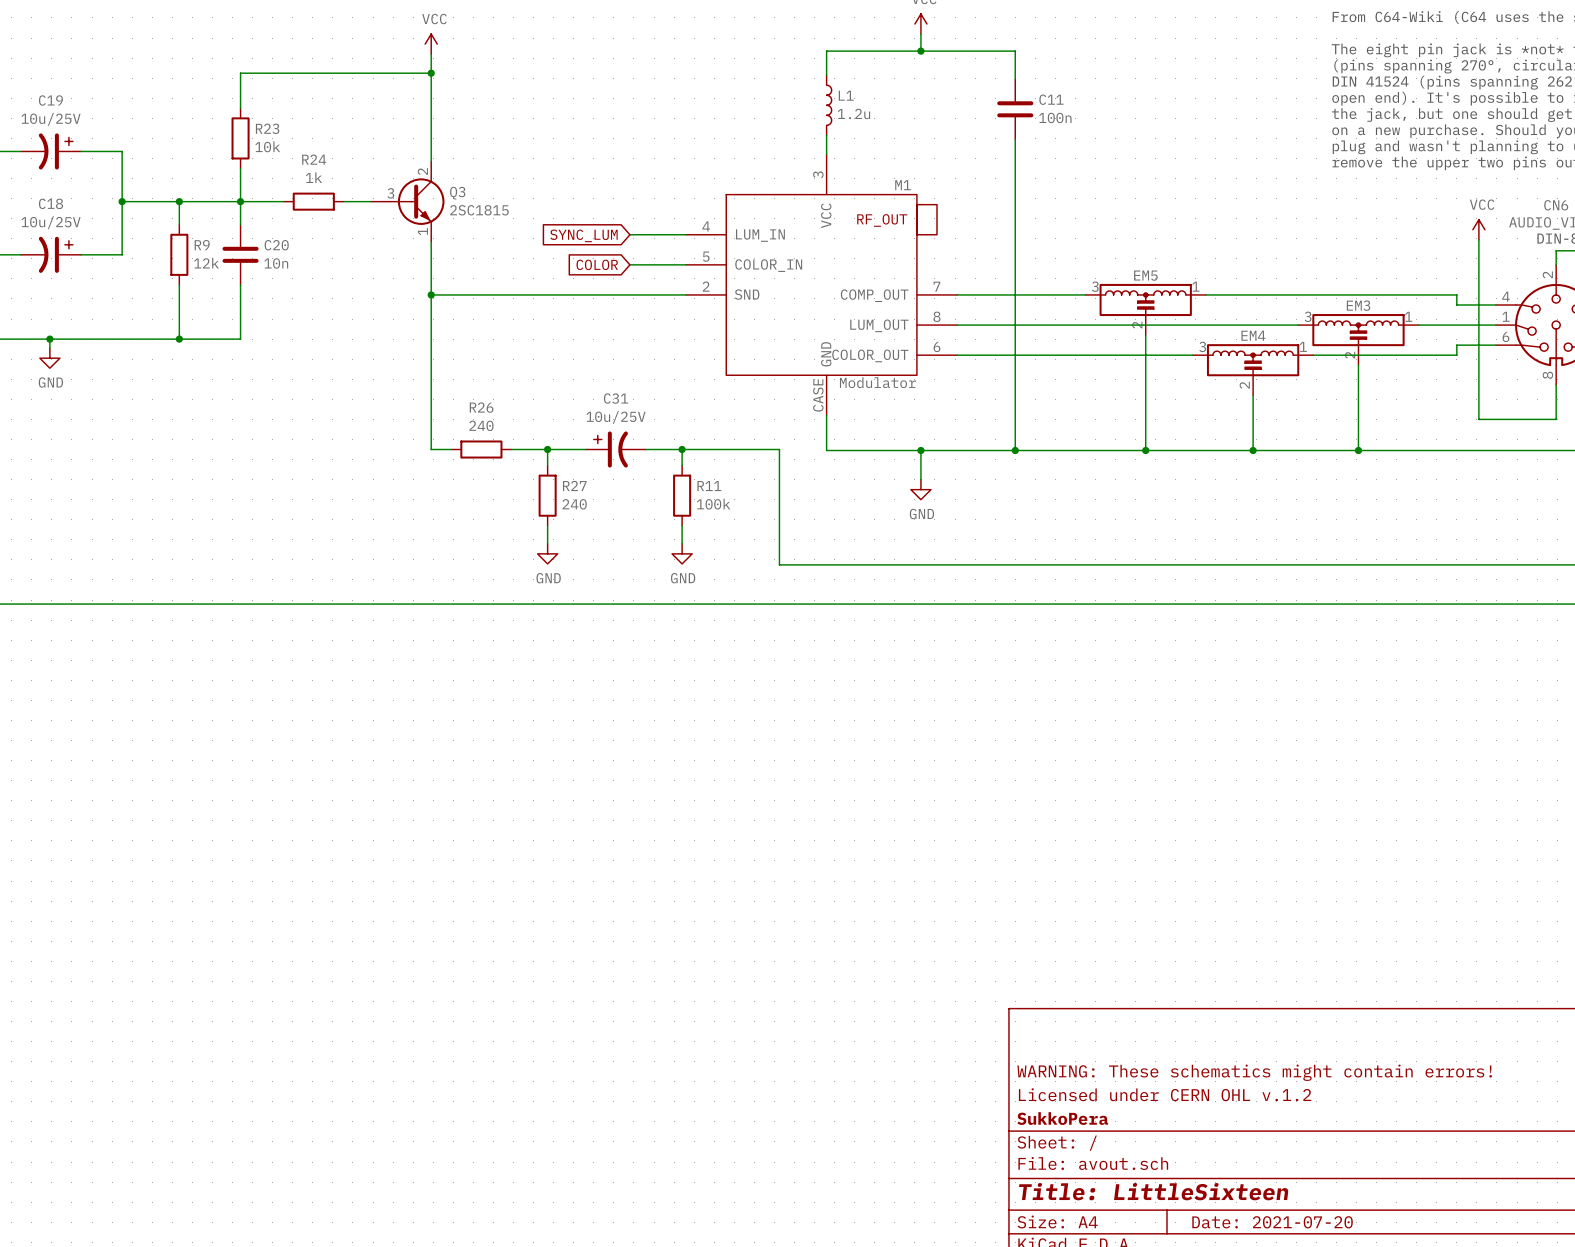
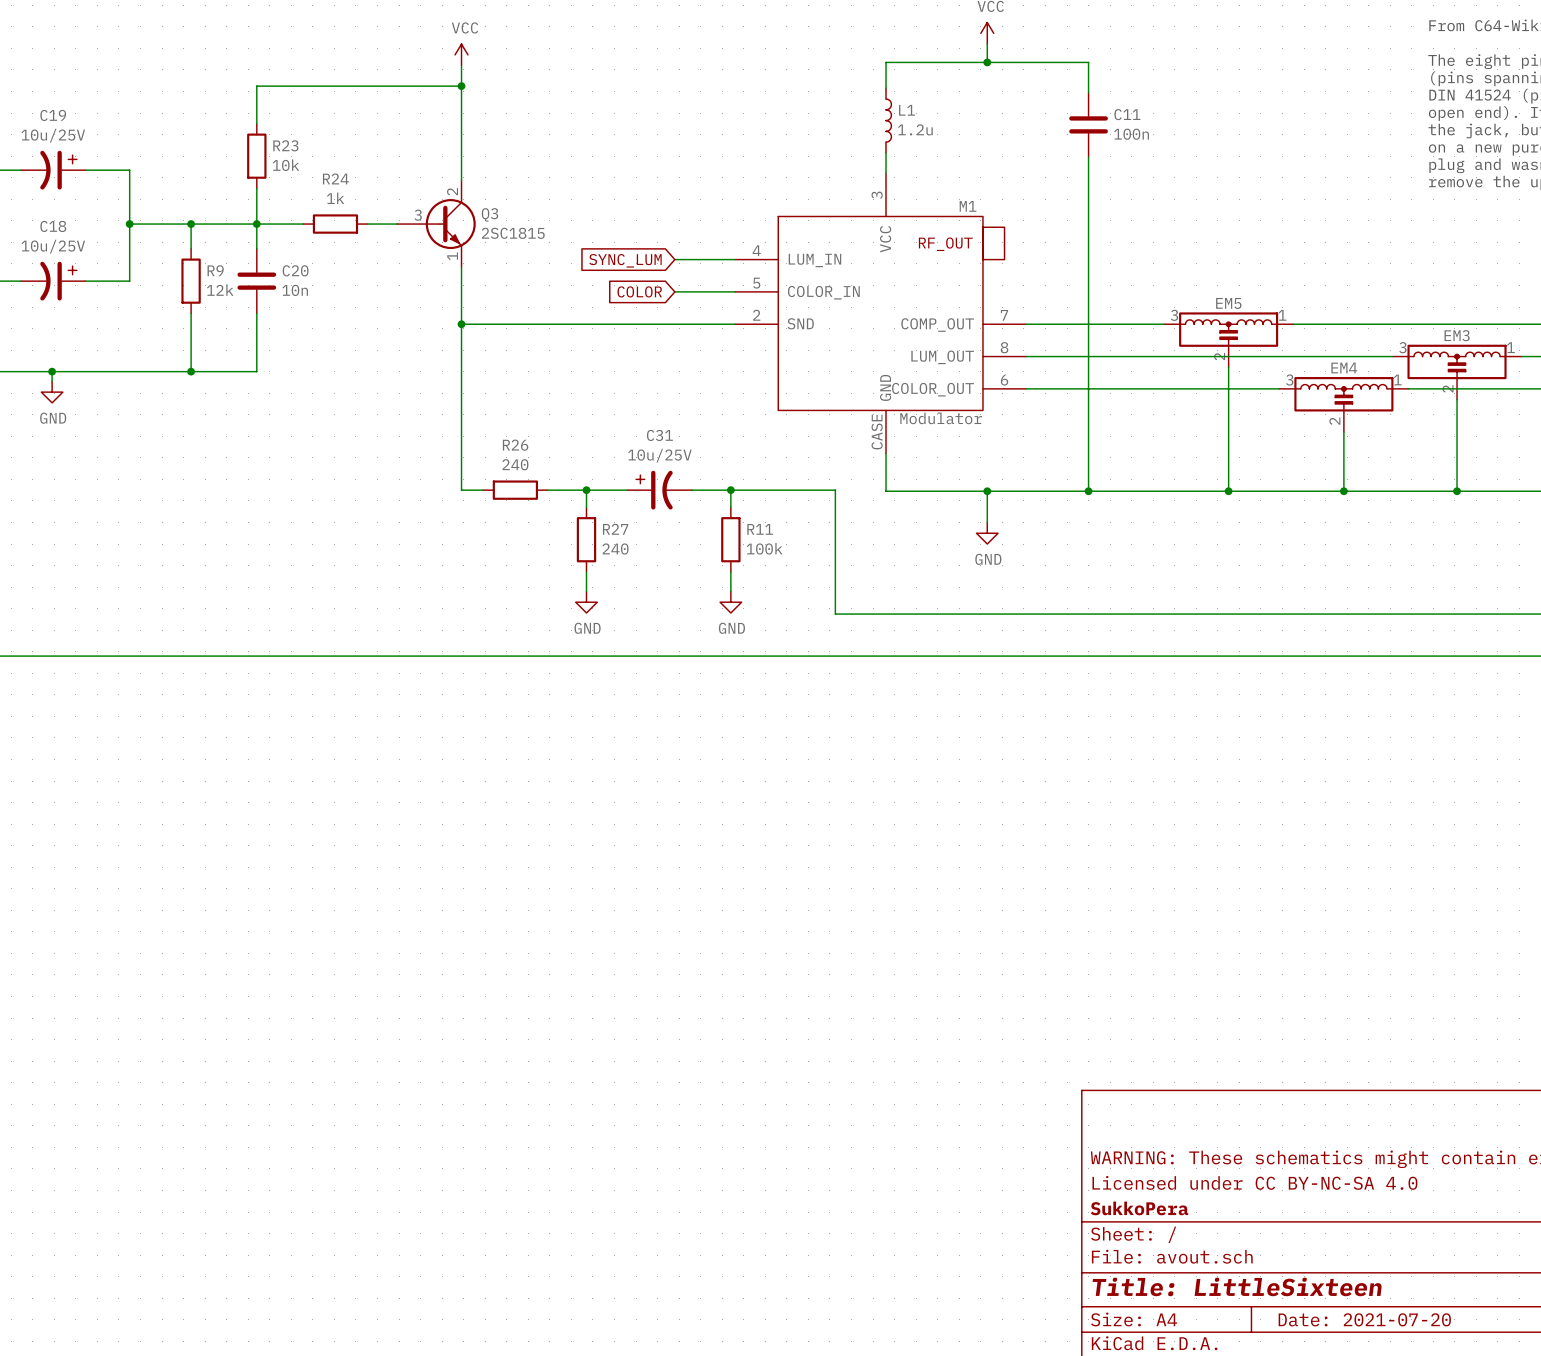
title block: Licensed under CERN OHL v.1.2 (1165, 1094) -> Licensed under CC BY-NC-SA 4.0 (1254, 1182)

